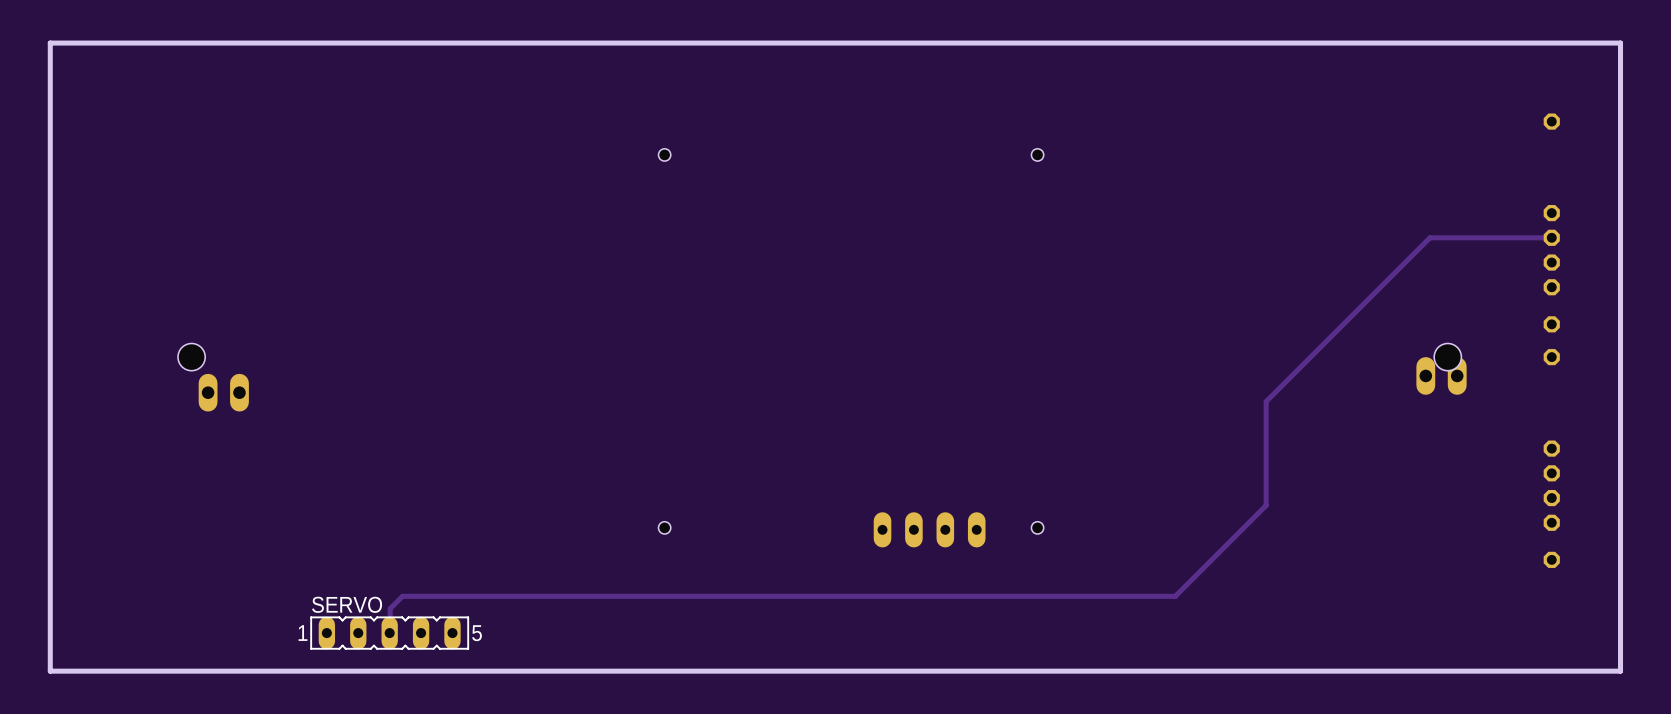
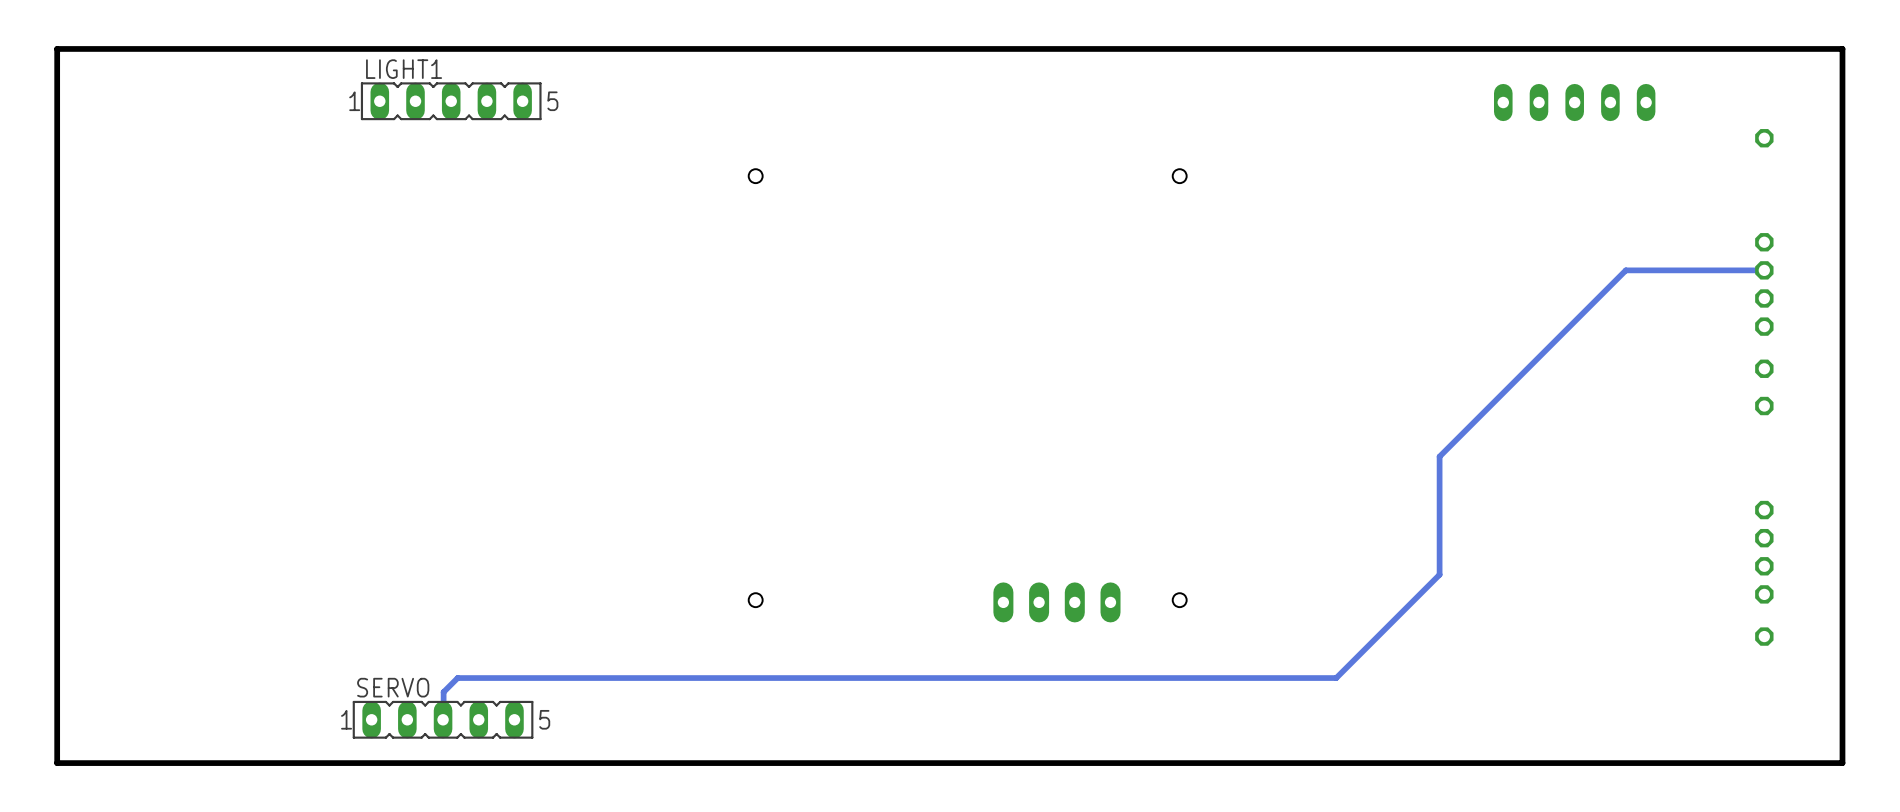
LIGHT1: none -> (451, 101)
part: none -> (1574, 102)
hole: (191, 357) -> none
hole: (1447, 357) -> none
part: (1441, 375) -> none
part: (223, 392) -> none

